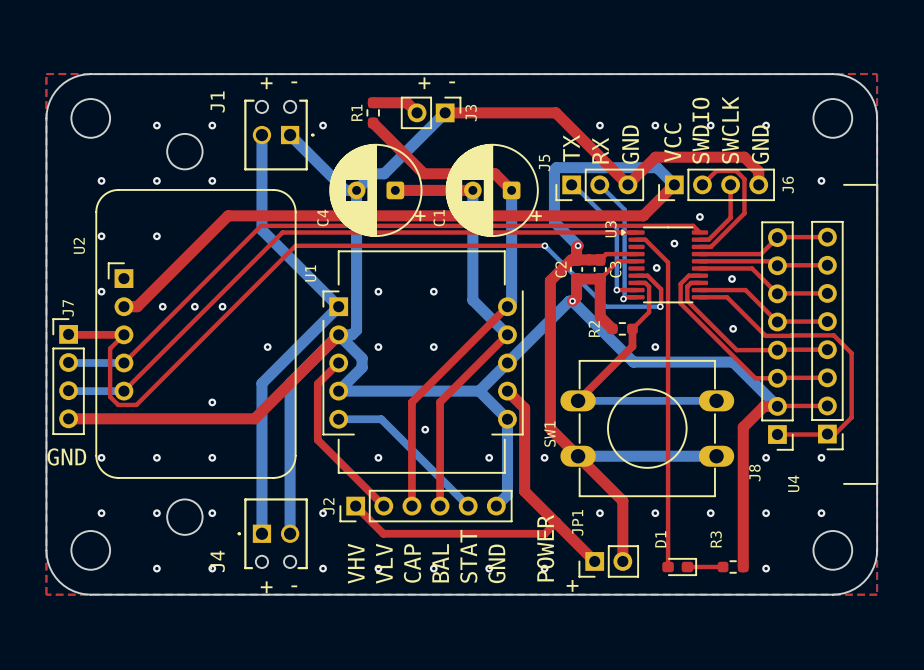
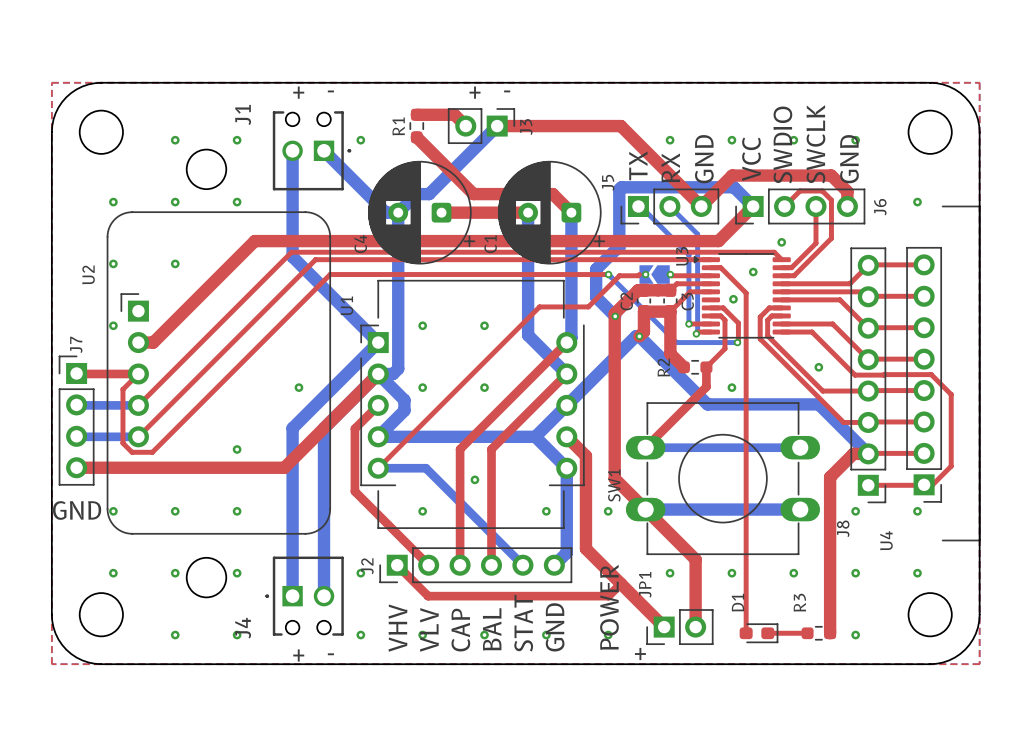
bottom track: (554, 222) (578, 245) -> (619, 248) (596, 269) (596, 297) (615, 316)
top track: none -> (639, 274) (619, 275) (588, 306) (539, 306) (378, 468)
top track: (578, 245) (576, 259) -> none
part: none -> (654, 274)
top track: none -> (670, 274) (710, 275)
via: none -> (670, 274)
via: (732, 279) -> none
via: none -> (615, 316)
via: (162, 306) -> none
via: (194, 306) -> none
via: (222, 306) -> none

